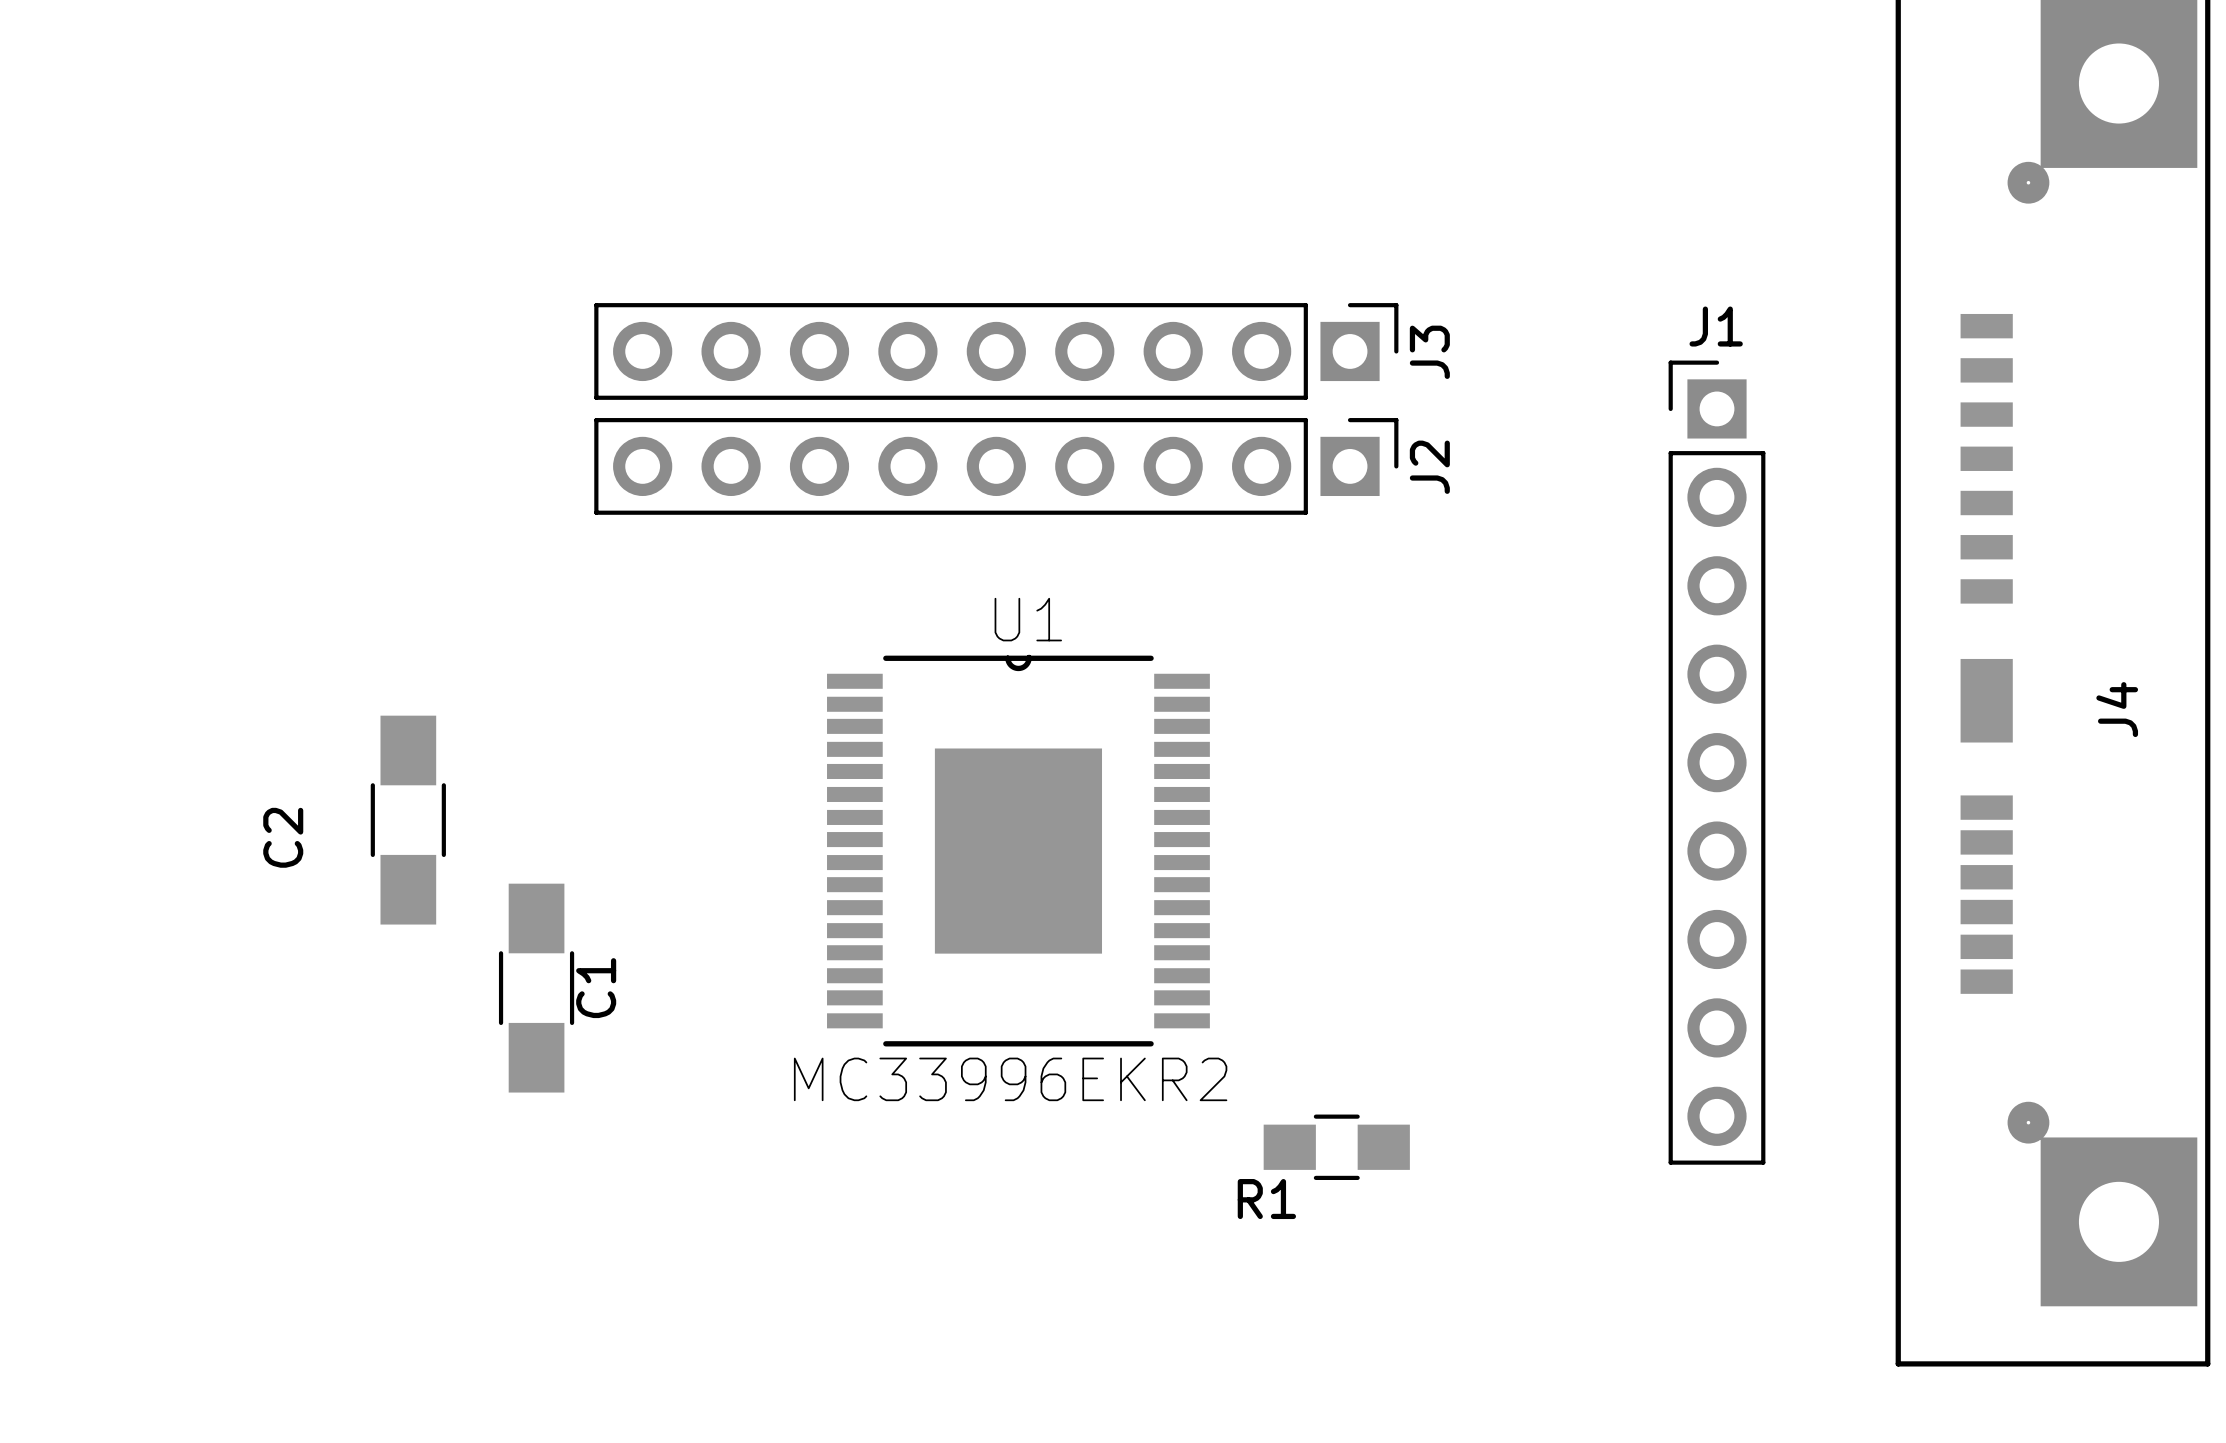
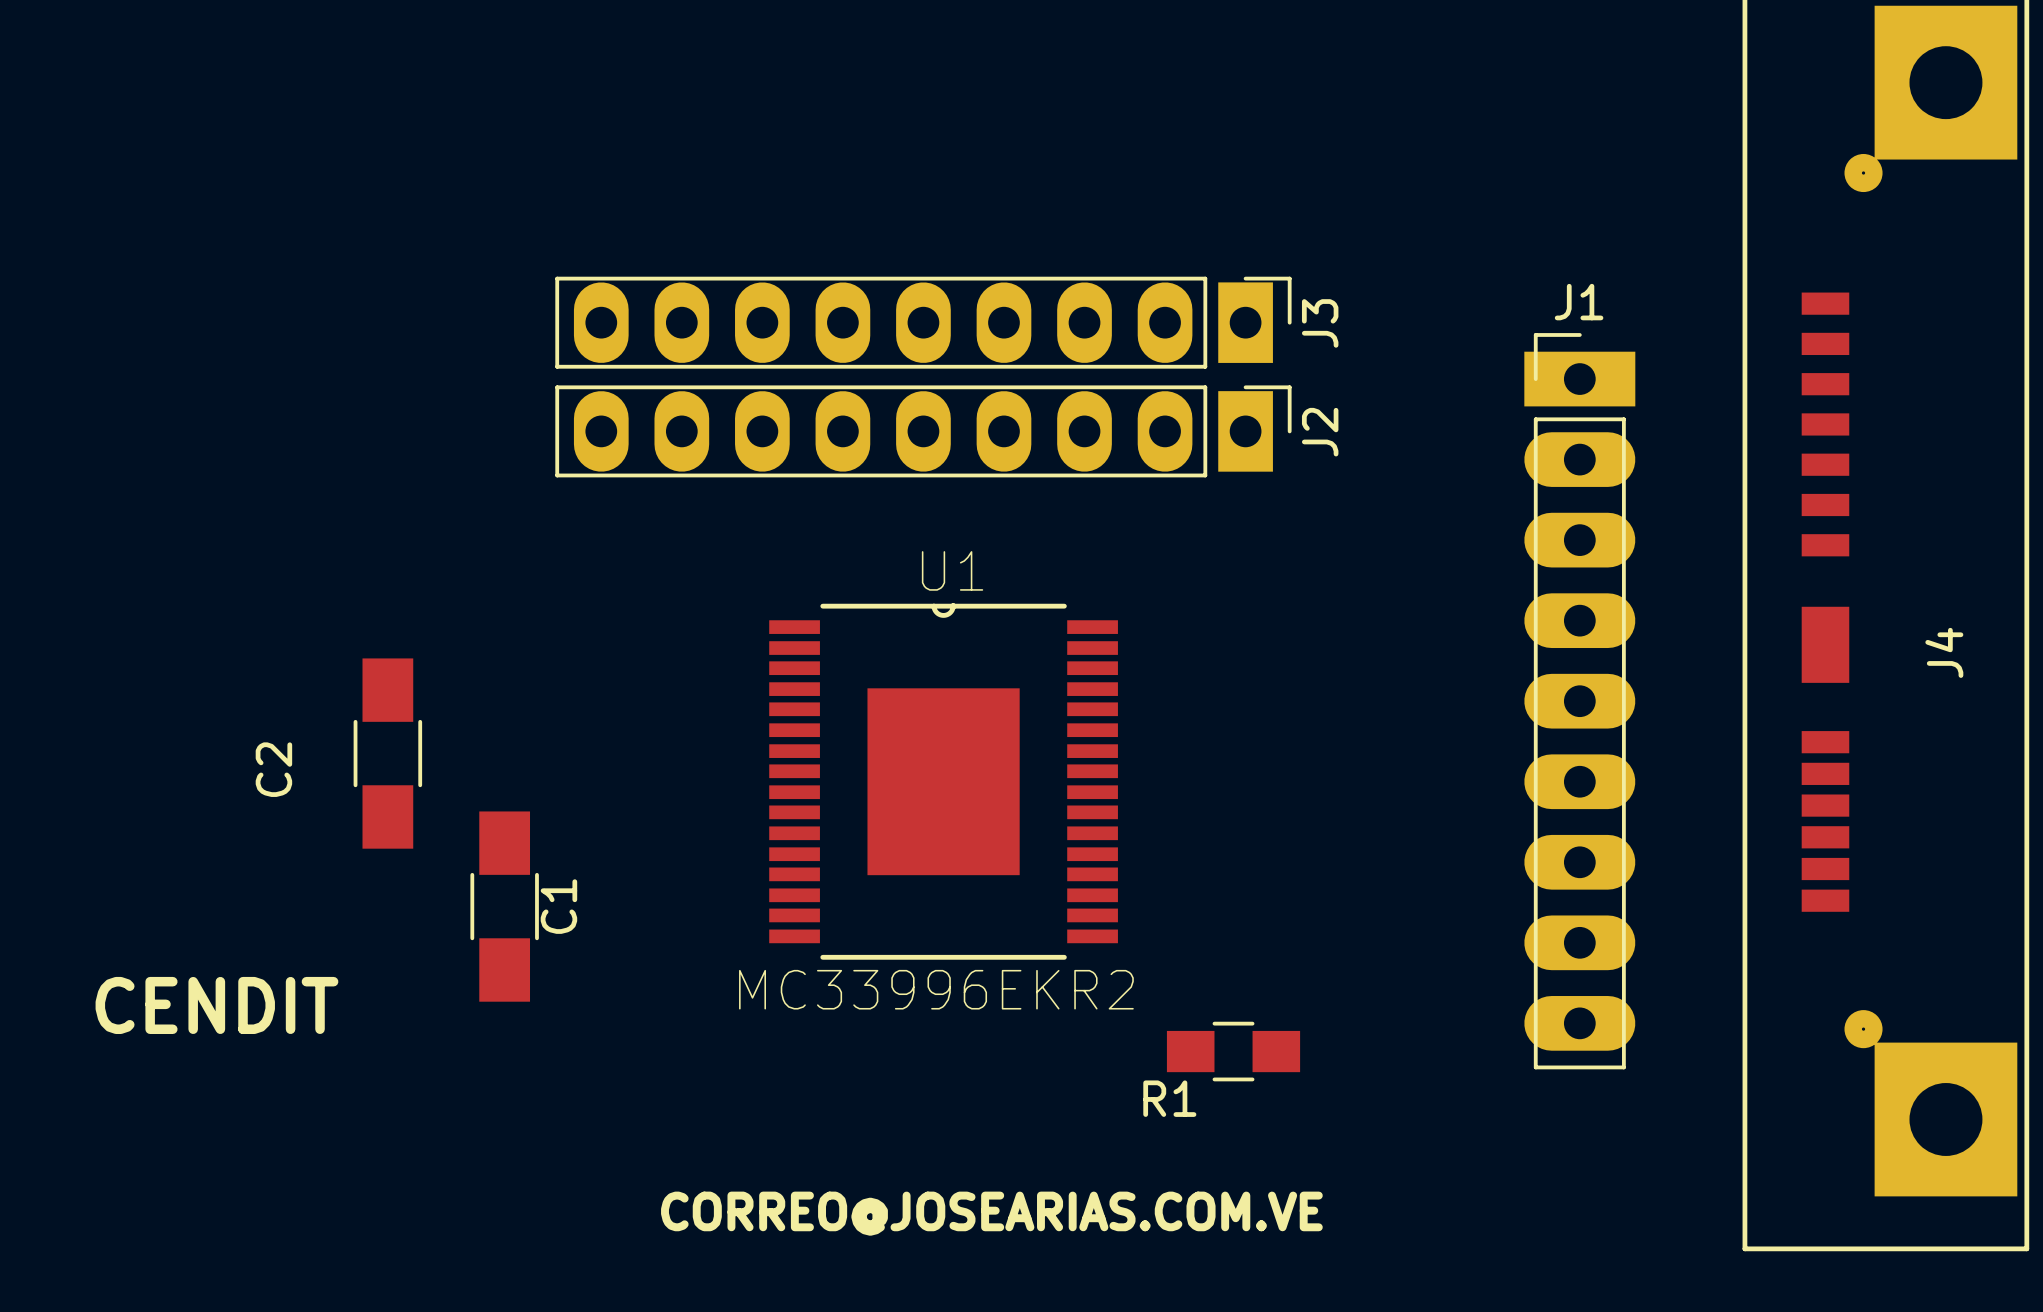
J3 footprint: [594, 303, 1399, 400] -> [555, 276, 1292, 369]
J1 footprint: [1668, 360, 1766, 1165] -> [1524, 333, 1636, 1070]
J2 footprint: [594, 418, 1399, 515] -> [555, 385, 1292, 478]
text: none -> CENDIT (216, 1005)
text: none -> CORREO@JOSEARIAS.COM.VE (991, 1213)

